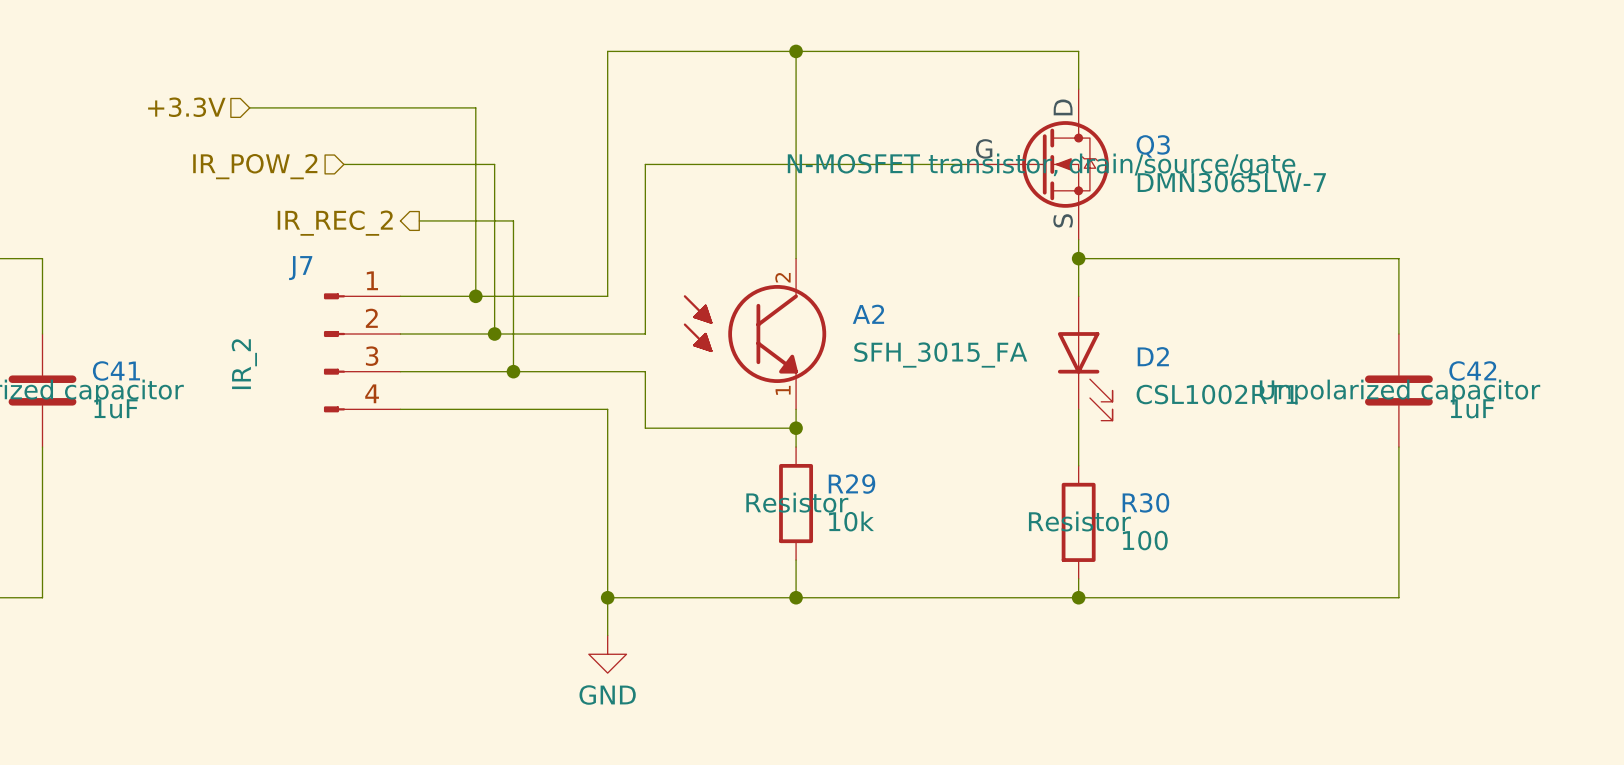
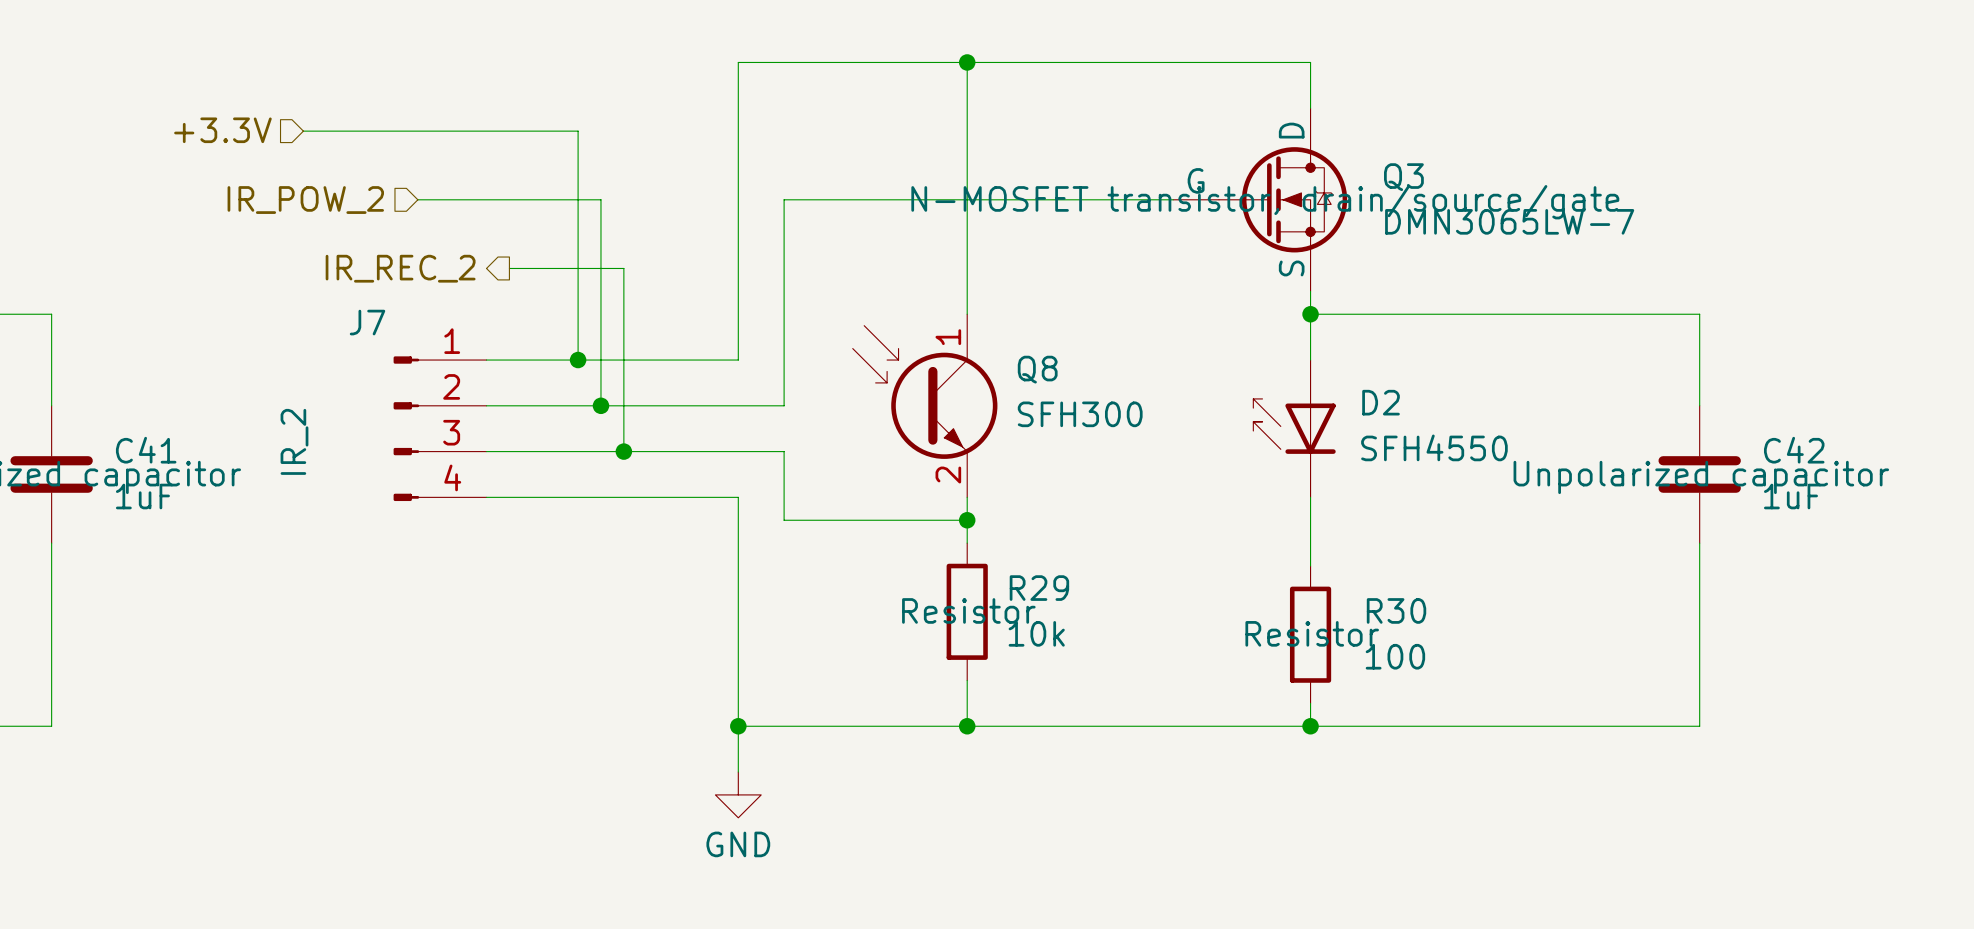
D2 symbol: [1057, 296, 1113, 421] -> [1253, 360, 1336, 498]
A2: SFH_3015_FA (754, 334) -> none
Q8: none -> SFH300 (925, 405)
D2 value: CSL1002RT1 (1217, 394) -> SFH4550 (1434, 447)

